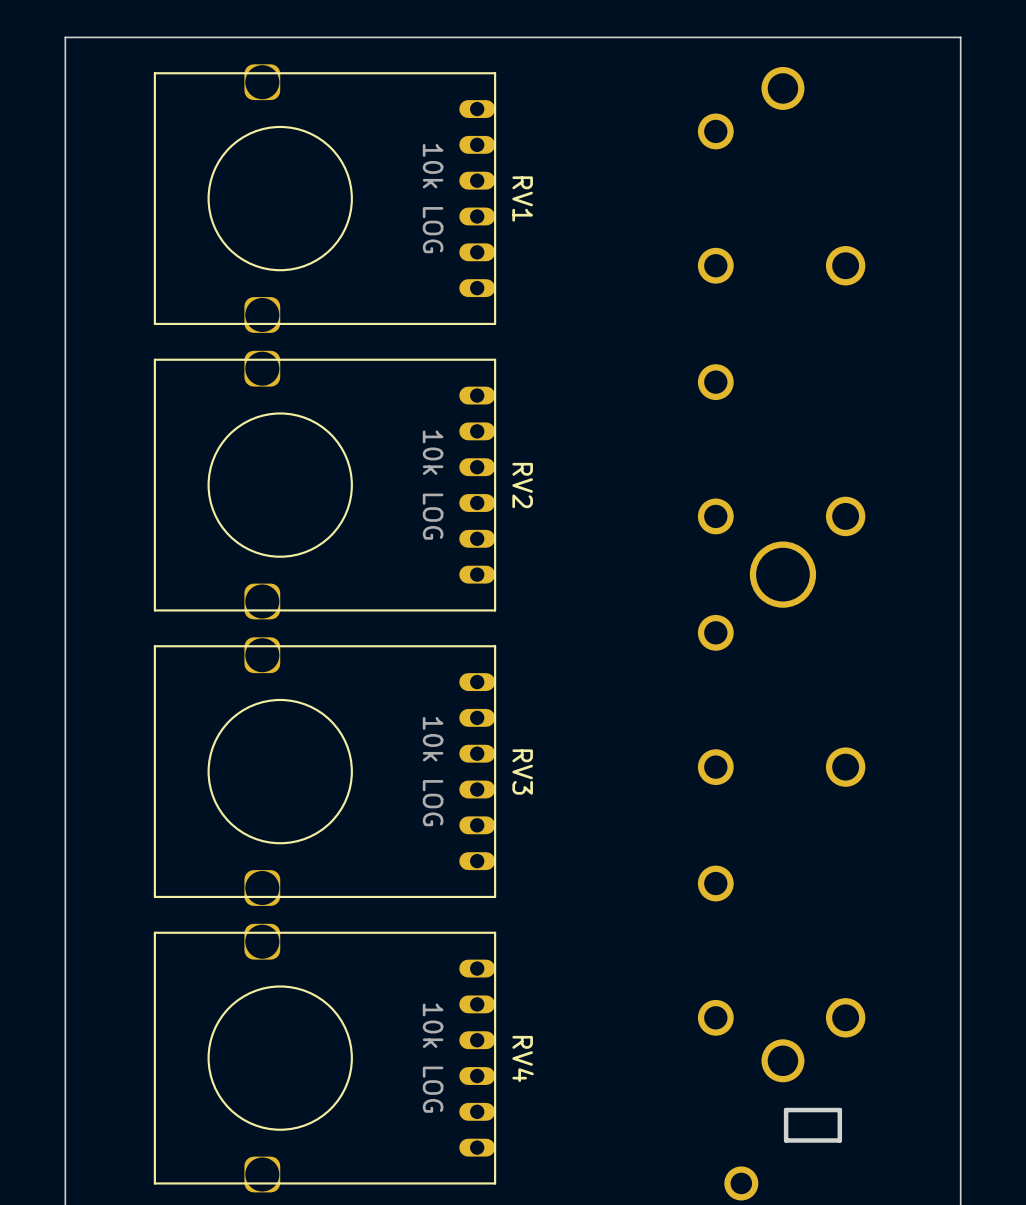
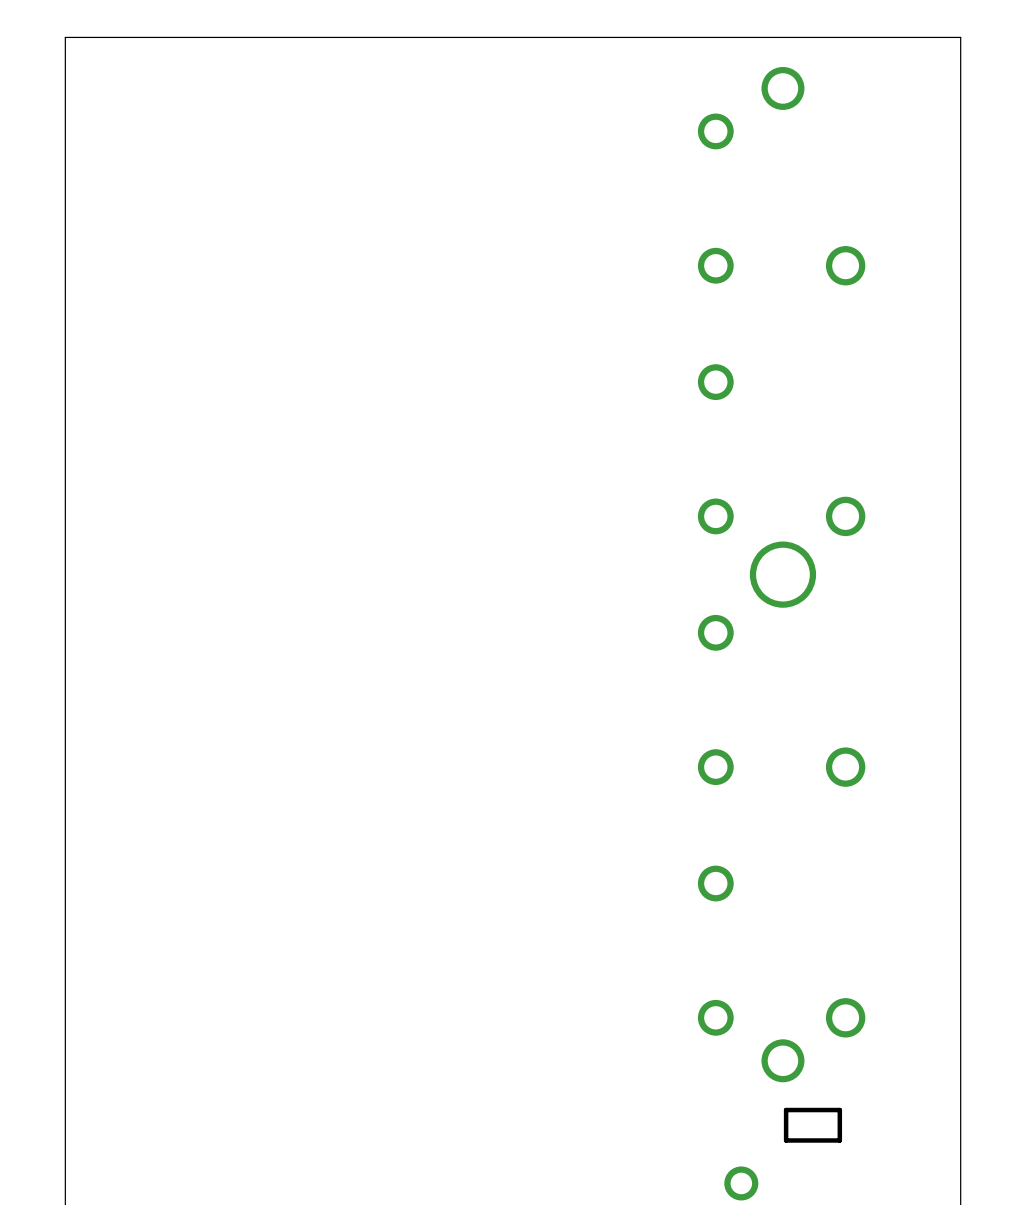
RV1: 10k LOG (324, 198) -> none
RV2: 10k LOG (324, 485) -> none
RV3: 10k LOG (324, 771) -> none
RV4: 10k LOG (324, 1058) -> none

